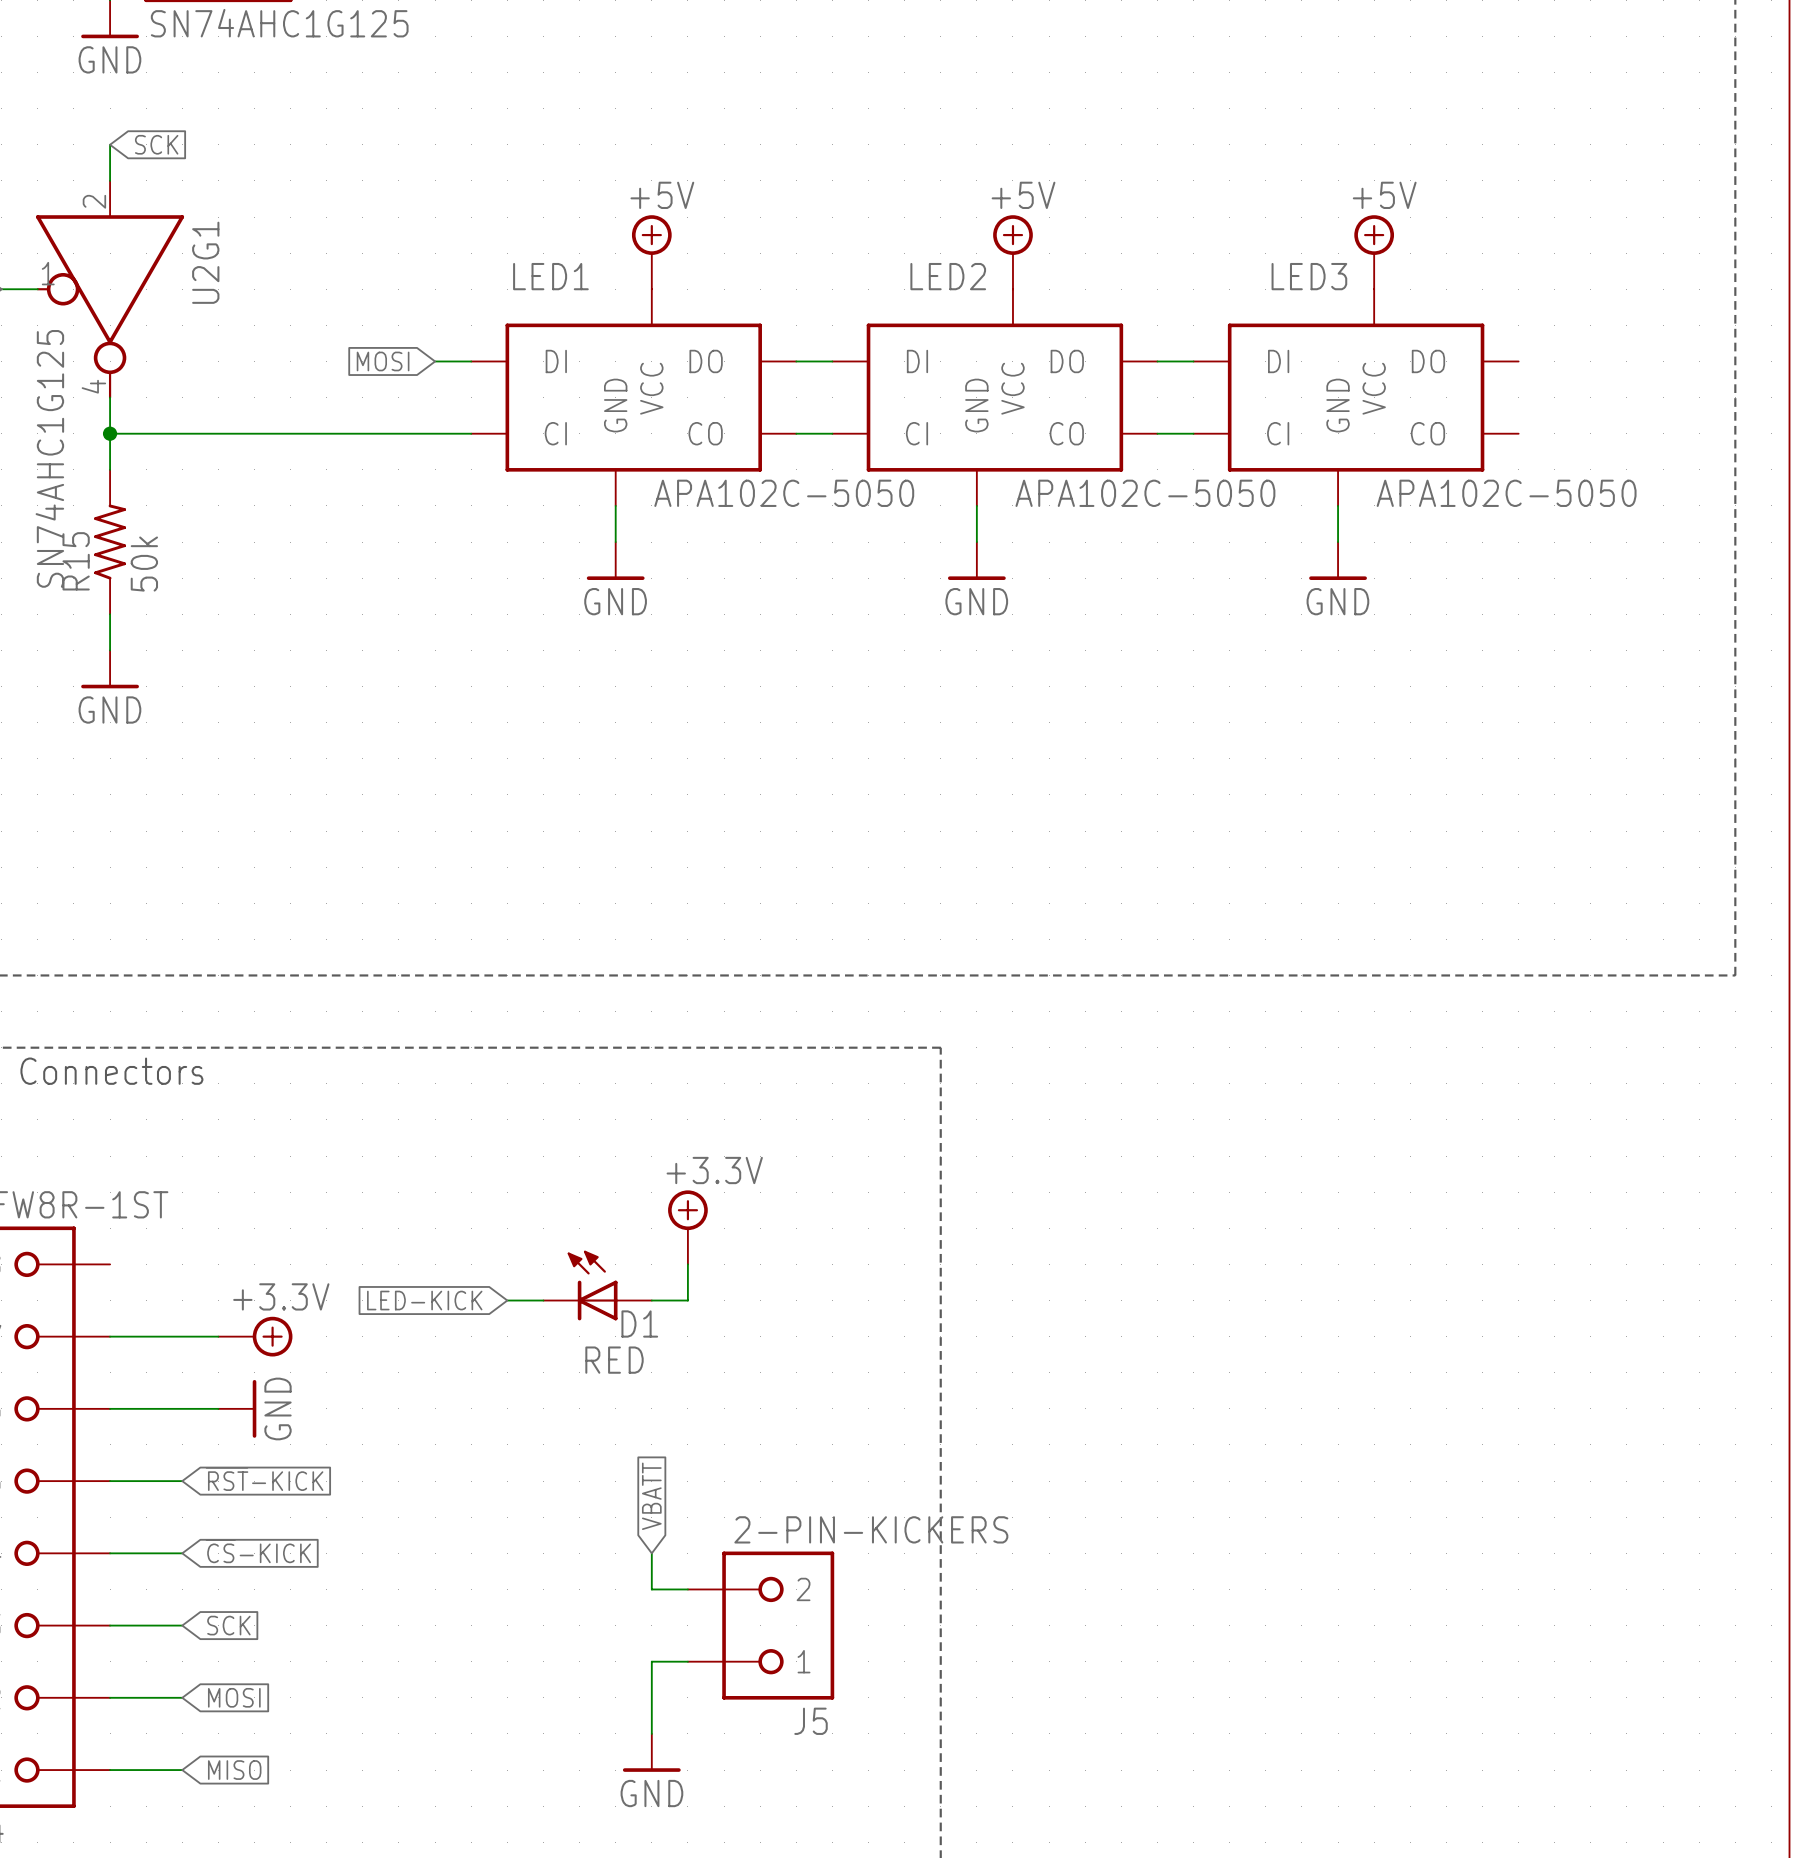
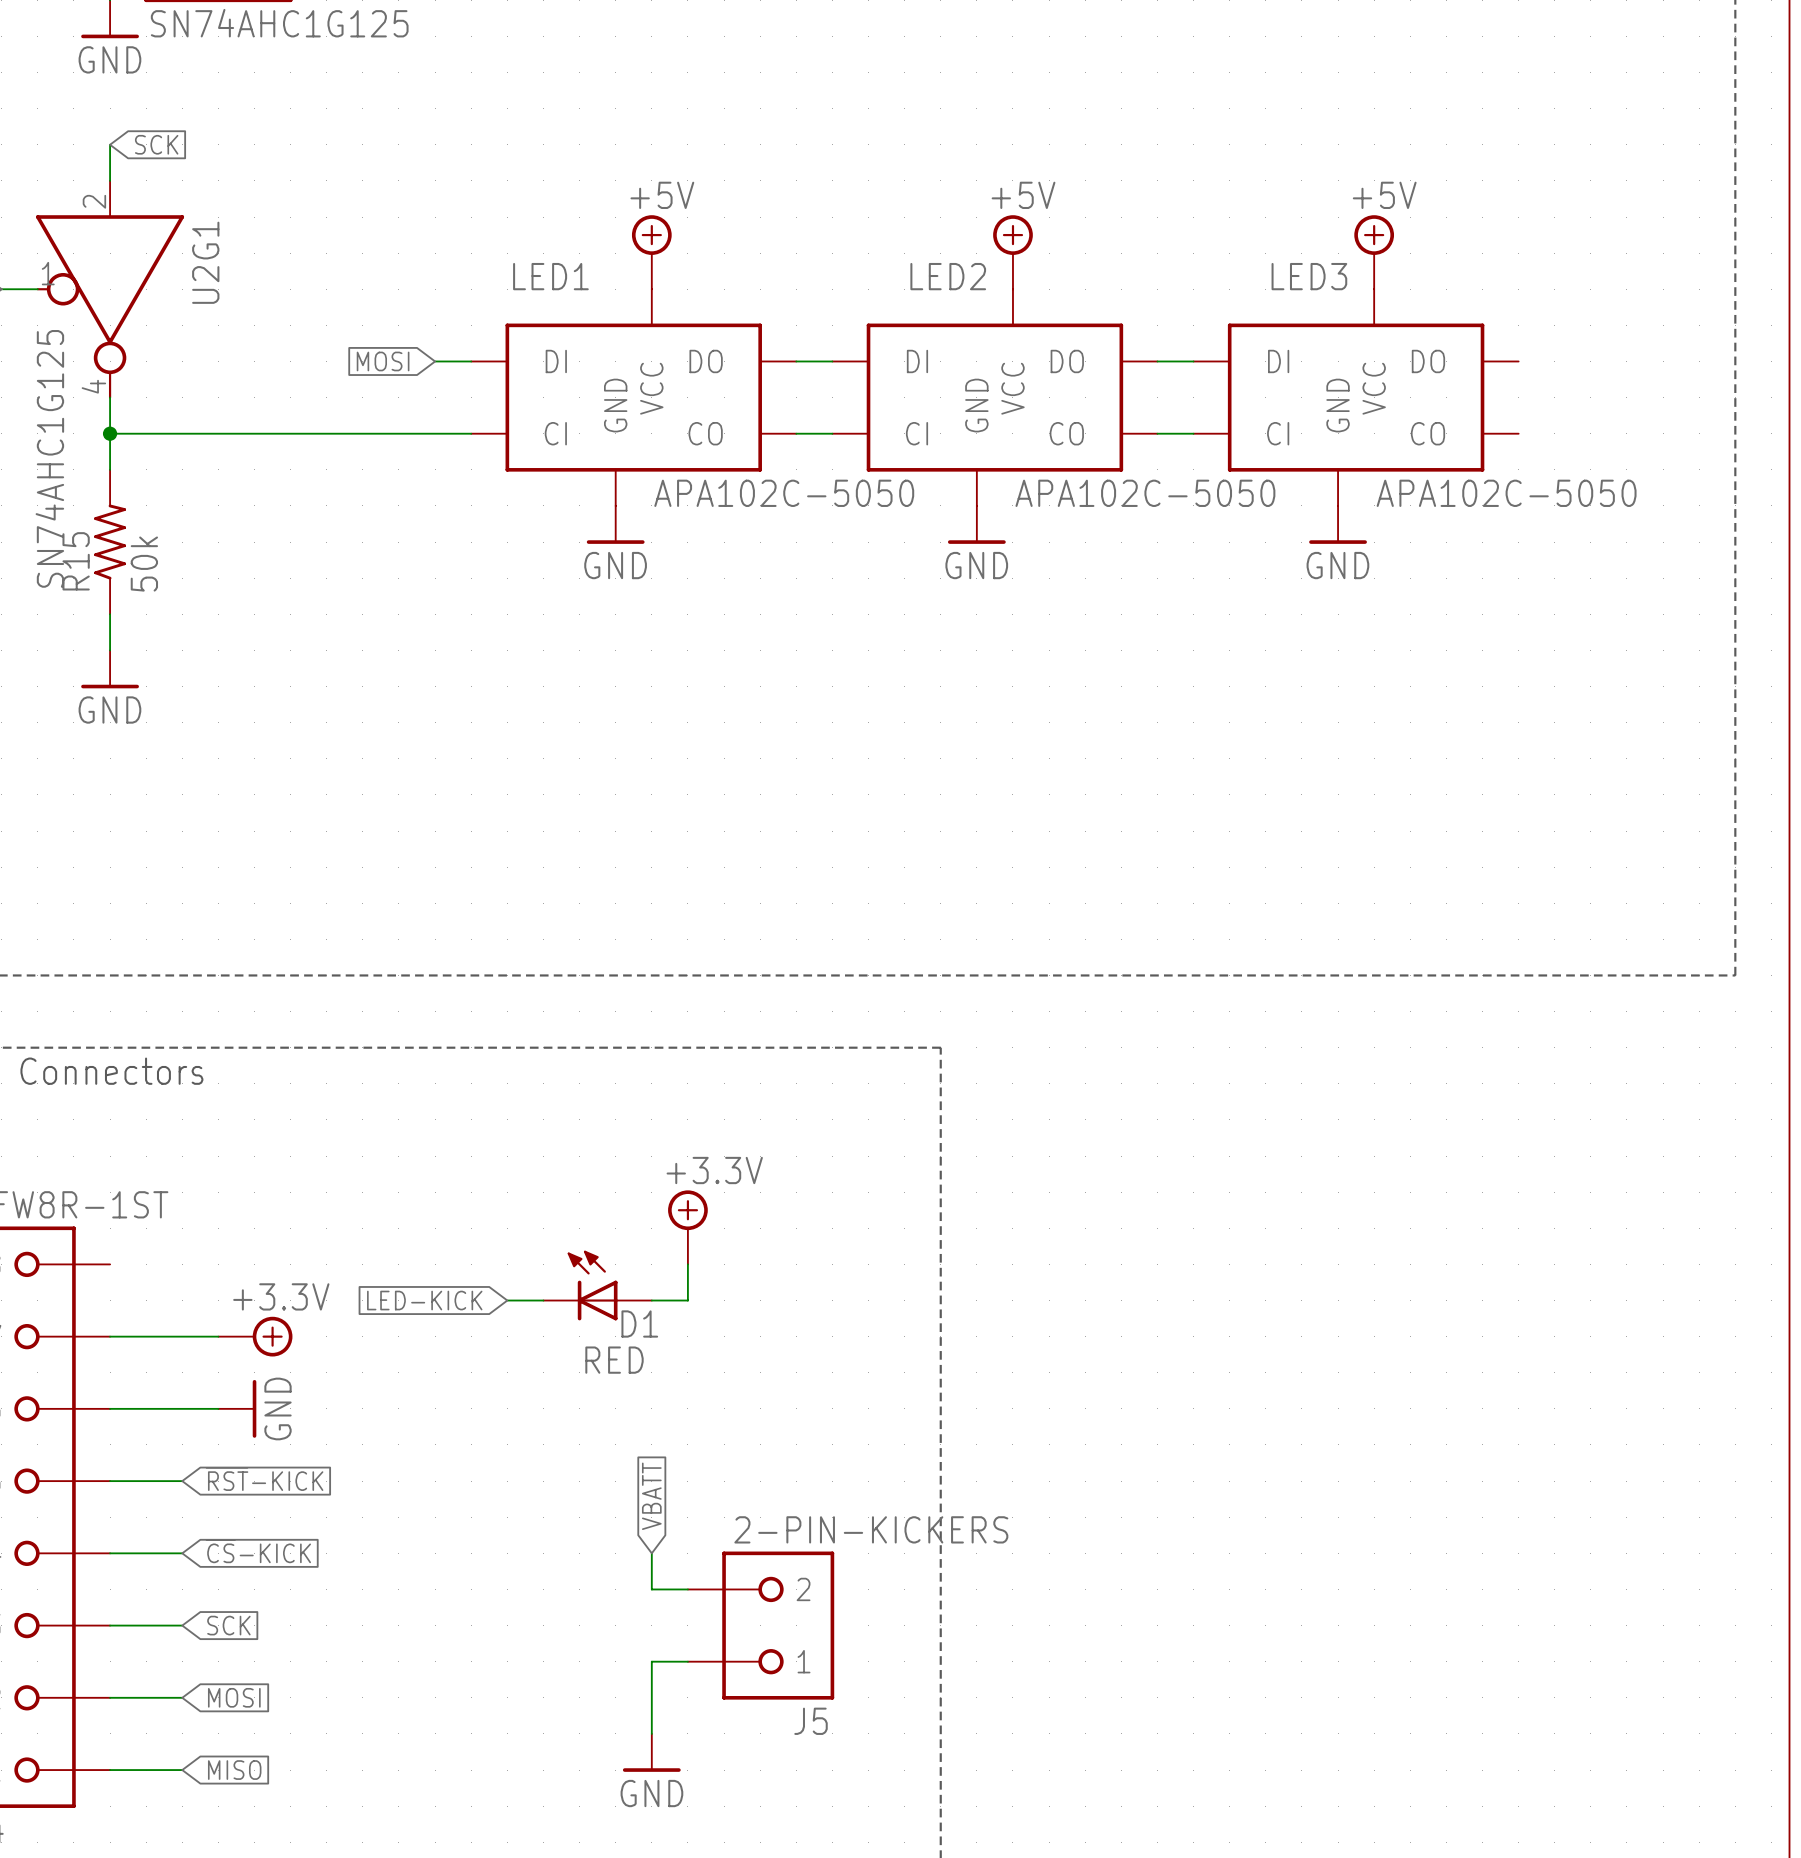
power symbol position: GND (615, 561) -> GND (615, 524)
power symbol position: GND (976, 561) -> GND (976, 524)
power symbol position: GND (1338, 561) -> GND (1338, 524)

